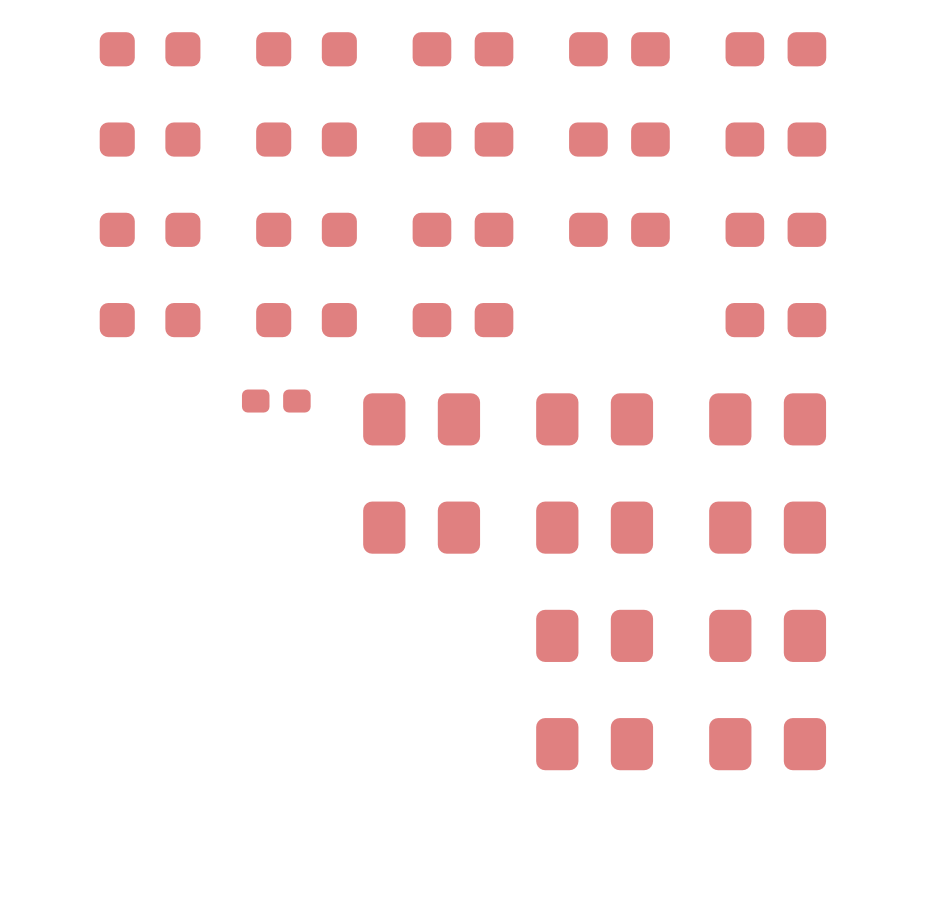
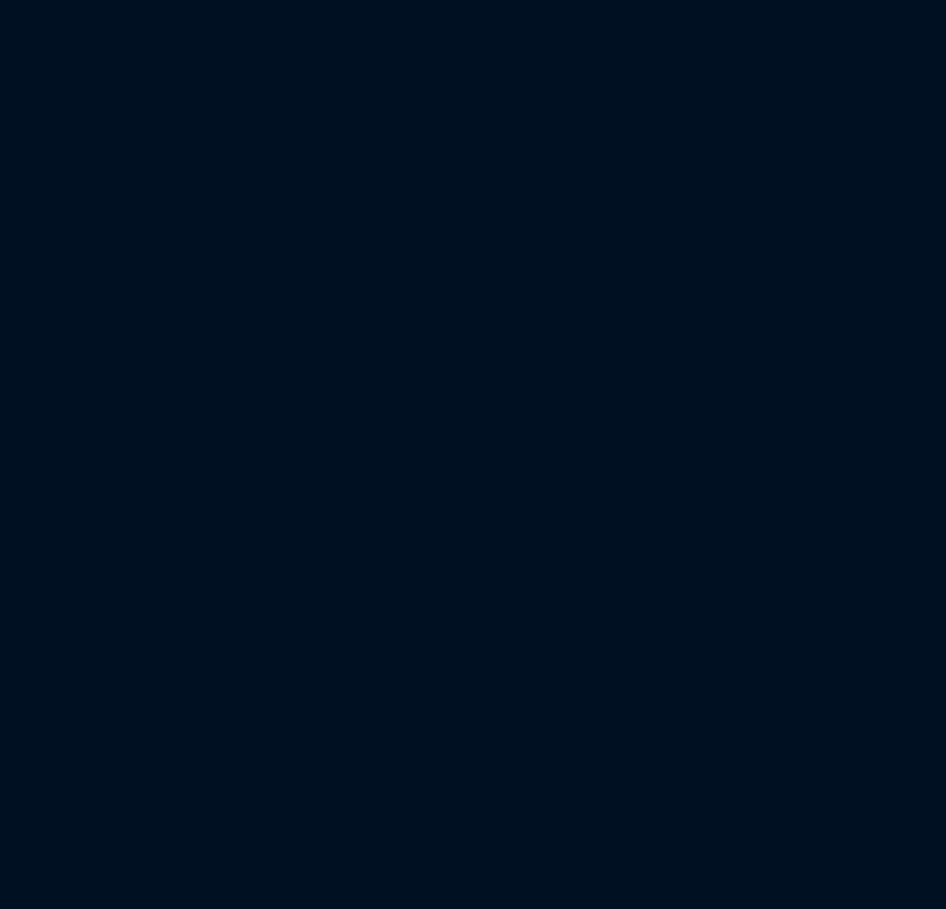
part: (150, 49) -> none
part: (306, 49) -> none
part: (462, 49) -> none
part: (619, 49) -> none
part: (775, 49) -> none
part: (150, 139) -> none
part: (306, 139) -> none
part: (462, 139) -> none
part: (619, 139) -> none
part: (775, 139) -> none
part: (150, 229) -> none
part: (306, 229) -> none
part: (462, 229) -> none
part: (619, 229) -> none
part: (775, 229) -> none
part: (150, 320) -> none
part: (306, 320) -> none
part: (462, 320) -> none
part: (775, 320) -> none
part: (276, 401) -> none
part: (421, 419) -> none
part: (594, 419) -> none
part: (767, 419) -> none
part: (421, 527) -> none
part: (594, 527) -> none
part: (767, 527) -> none
part: (594, 635) -> none
part: (767, 635) -> none
part: (594, 744) -> none
part: (767, 744) -> none

